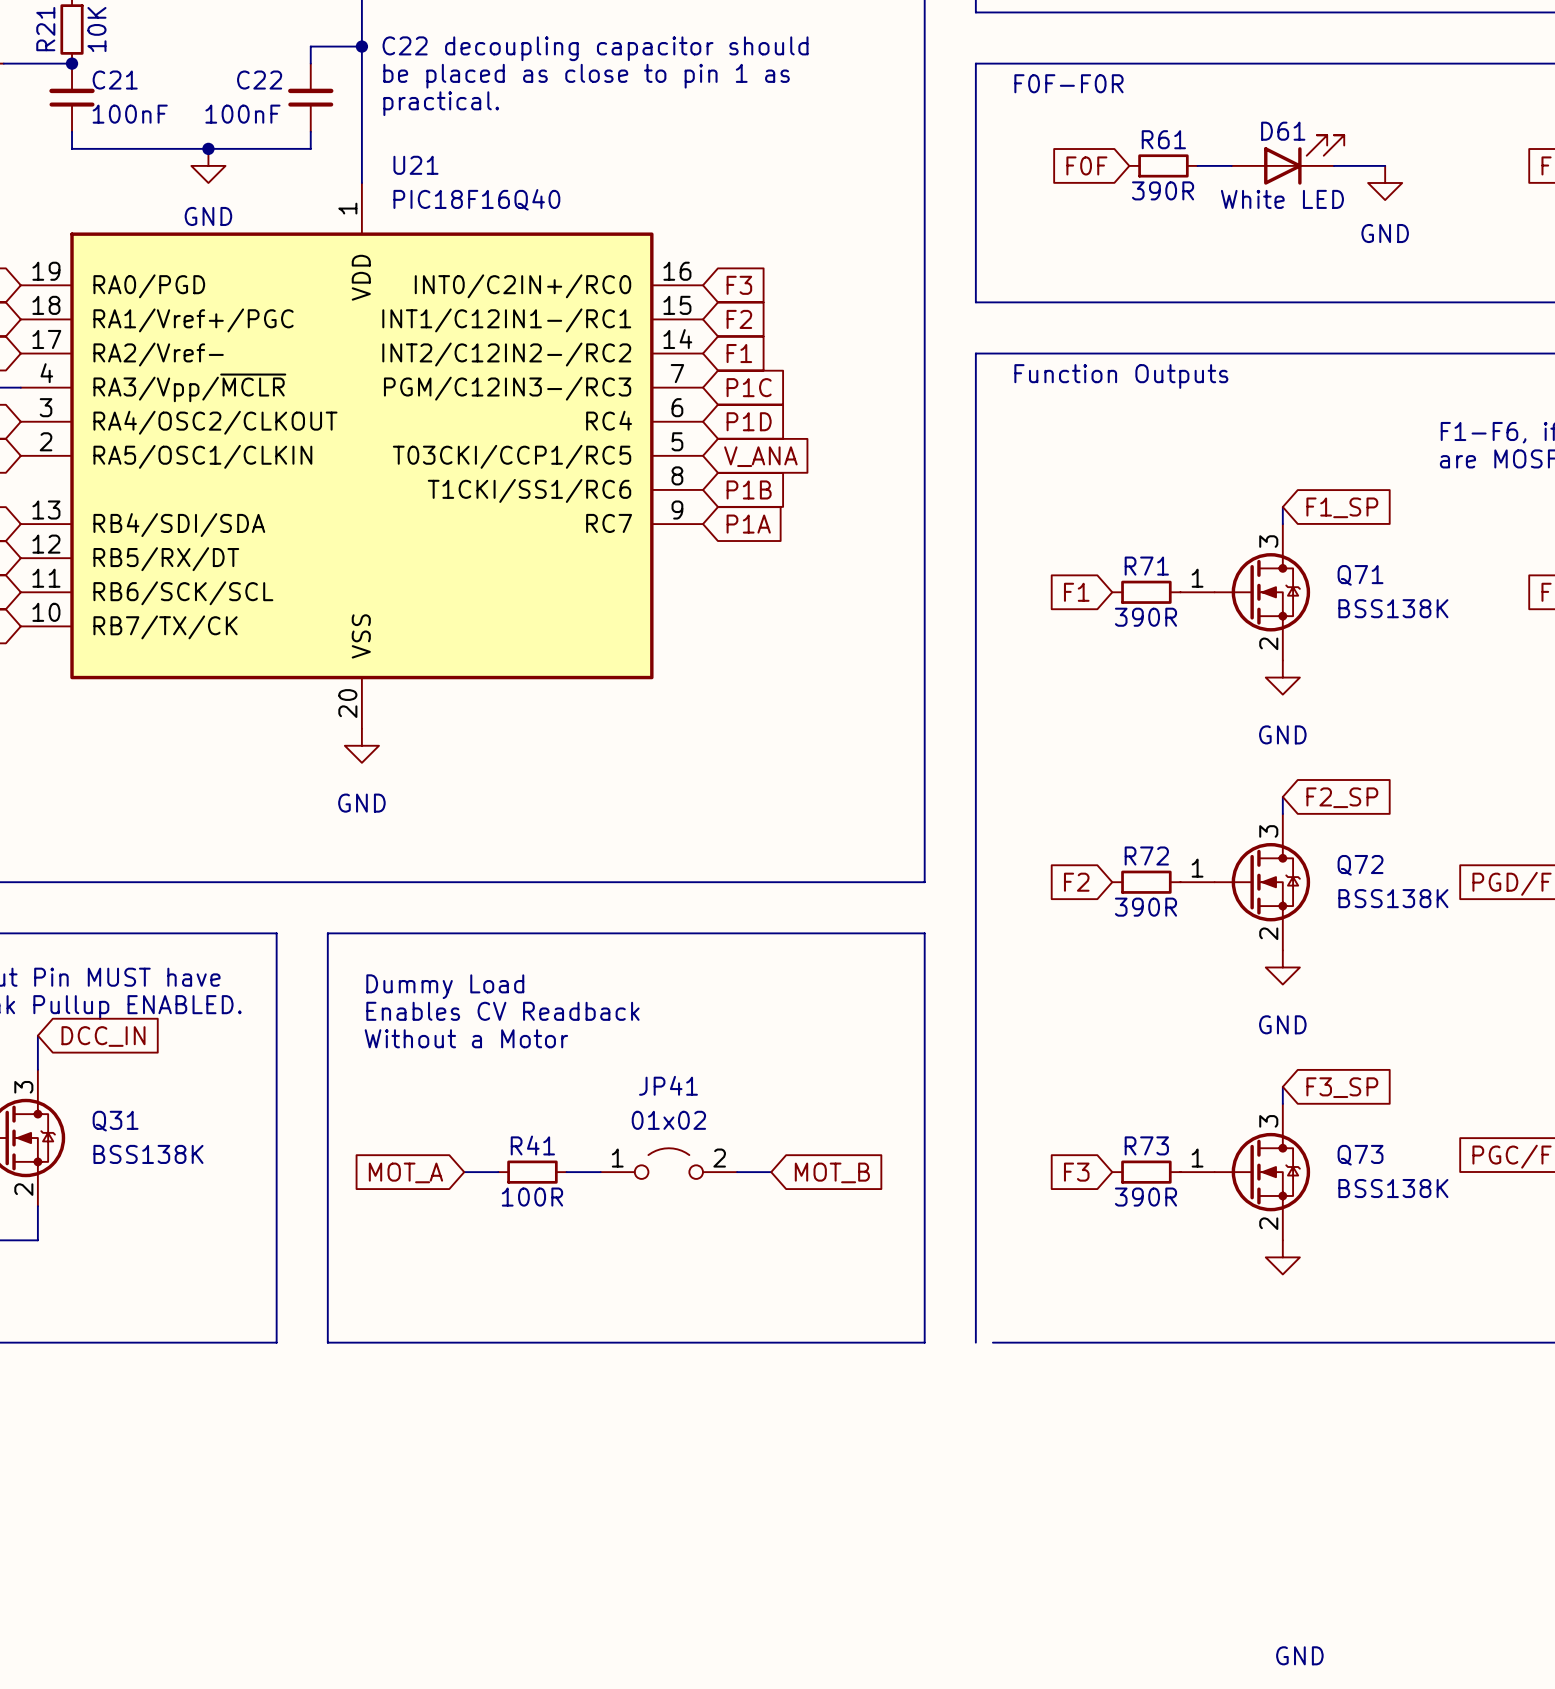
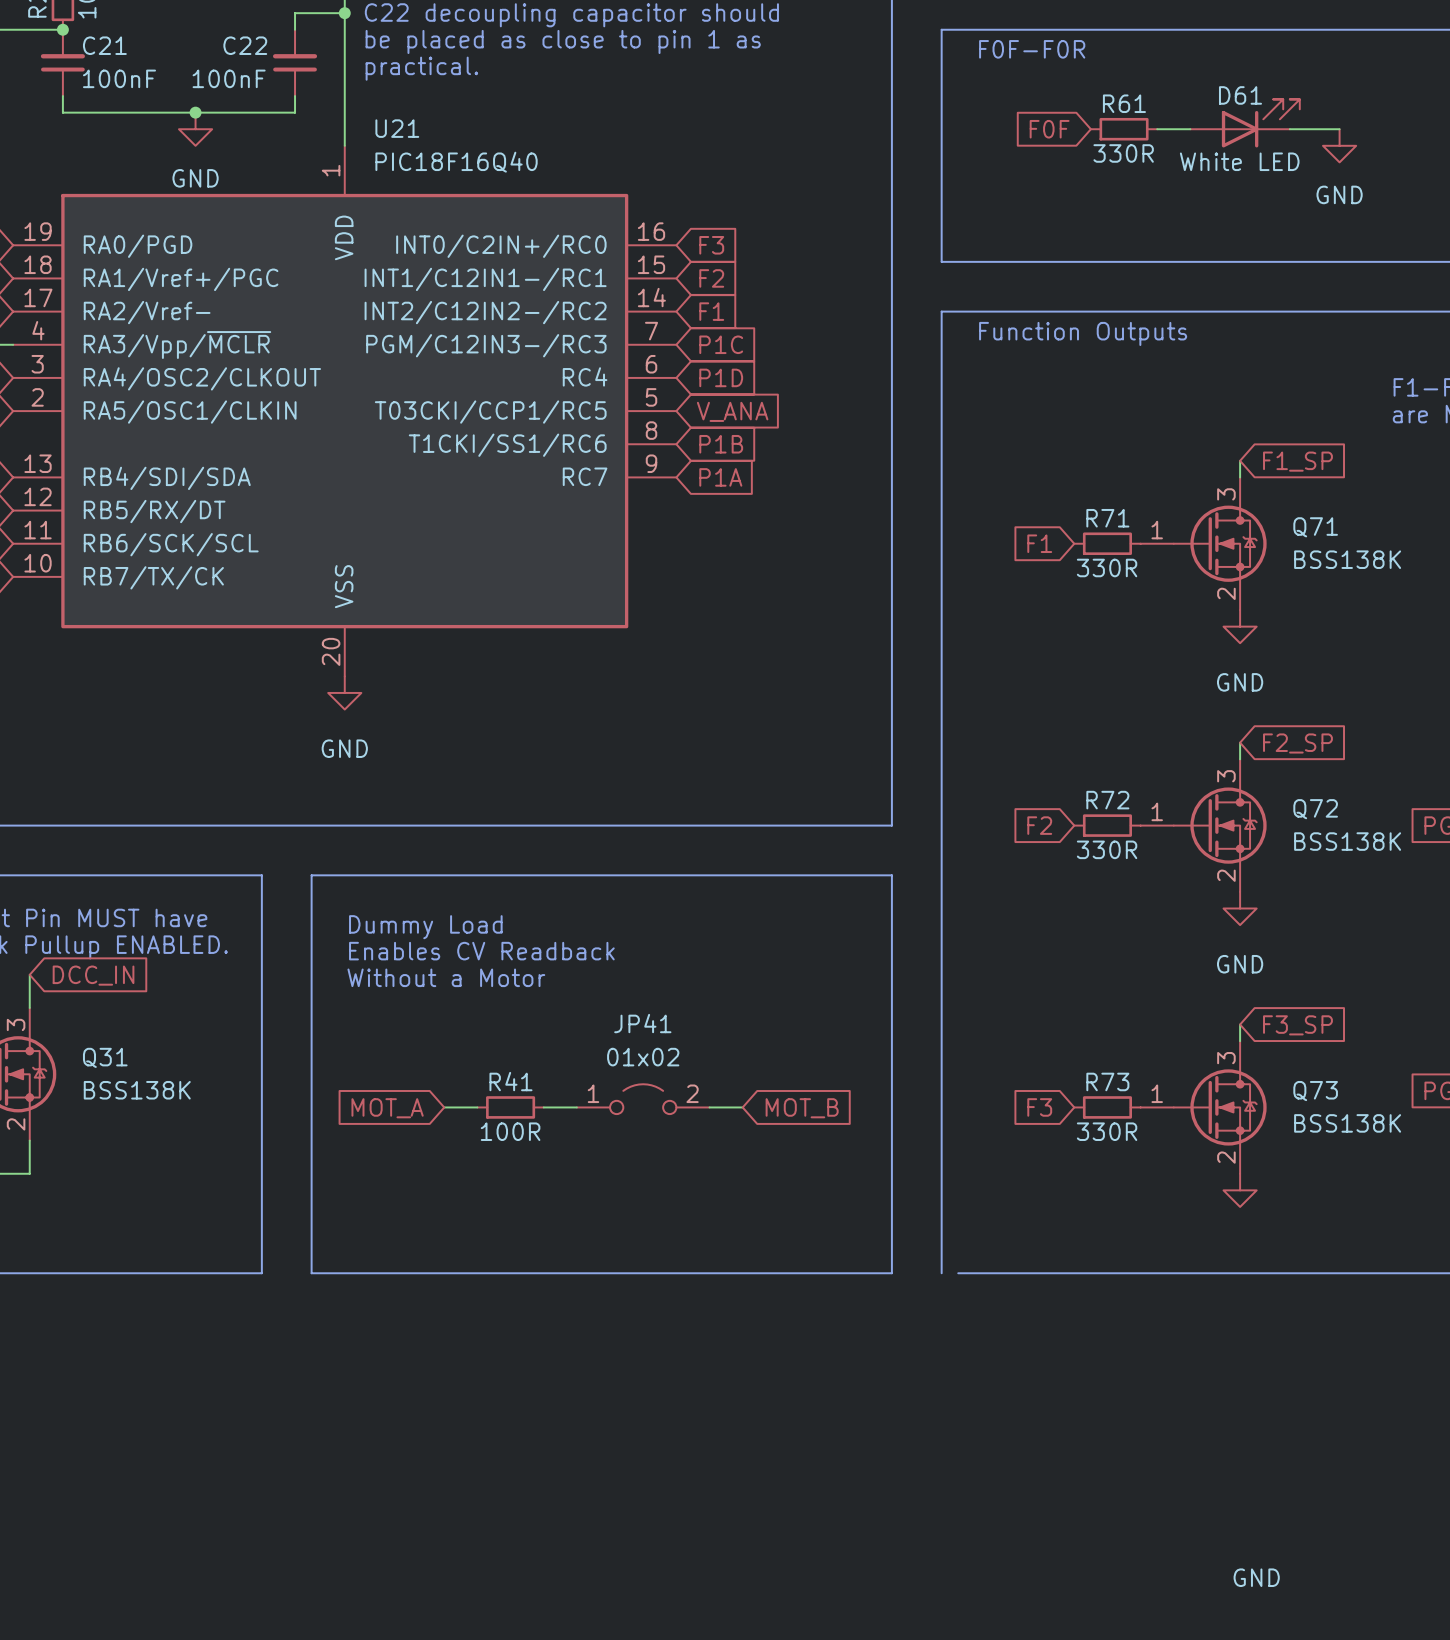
R61 value: 390R (1163, 190) -> 330R (1123, 153)
R71 value: 390R (1145, 617) -> 330R (1107, 567)
R72 value: 390R (1145, 907) -> 330R (1107, 849)
R73 value: 390R (1145, 1197) -> 330R (1107, 1131)

